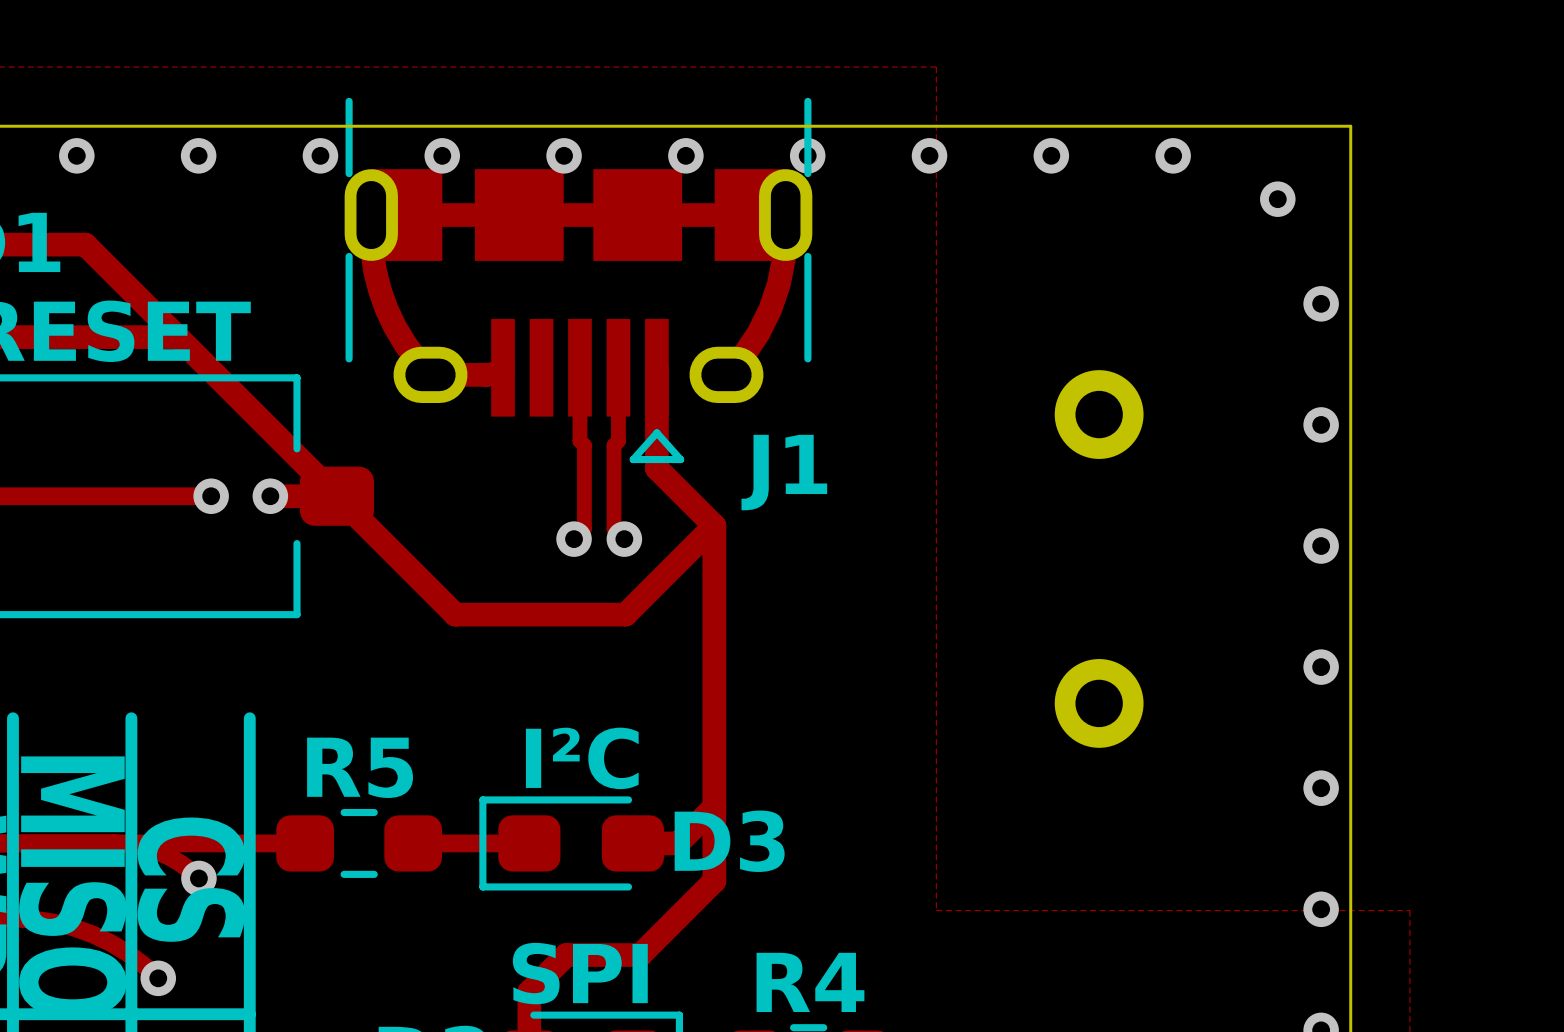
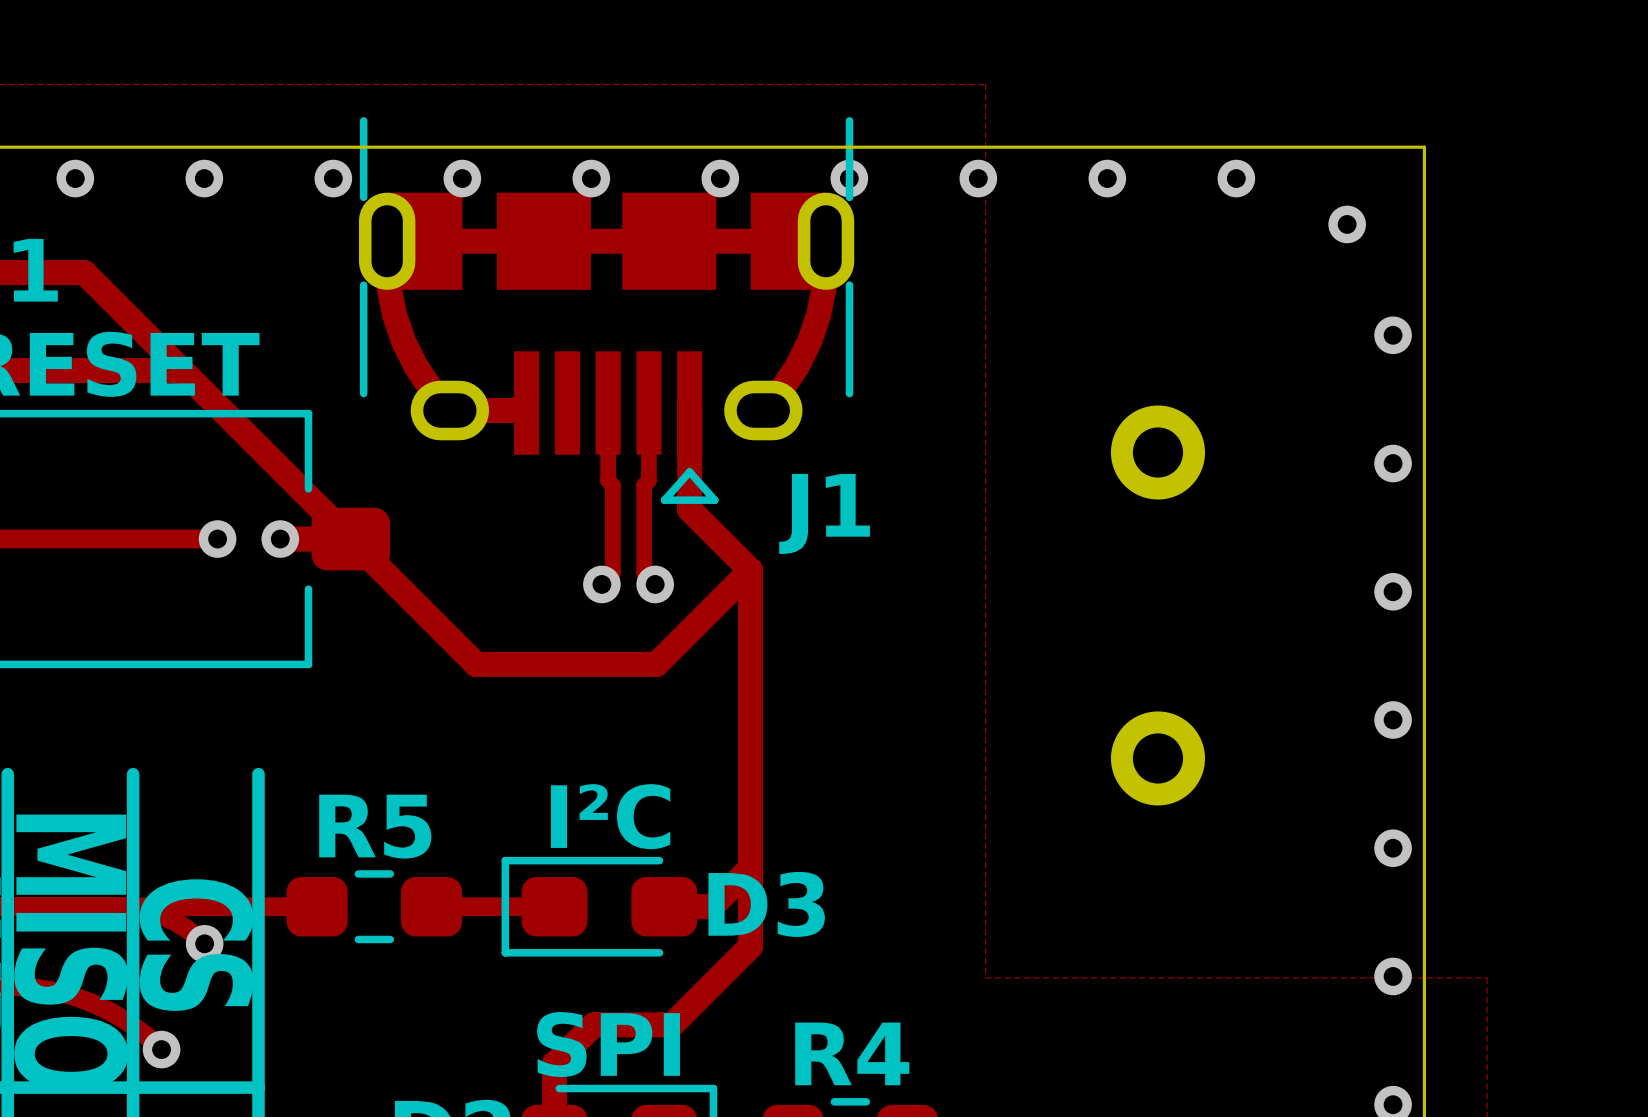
track: (371, 231) (375, 271) (386, 309) (405, 344) (430, 374) -> (387, 241) (389, 287) (394, 314) (403, 341) (415, 366) (431, 389) (449, 410)

